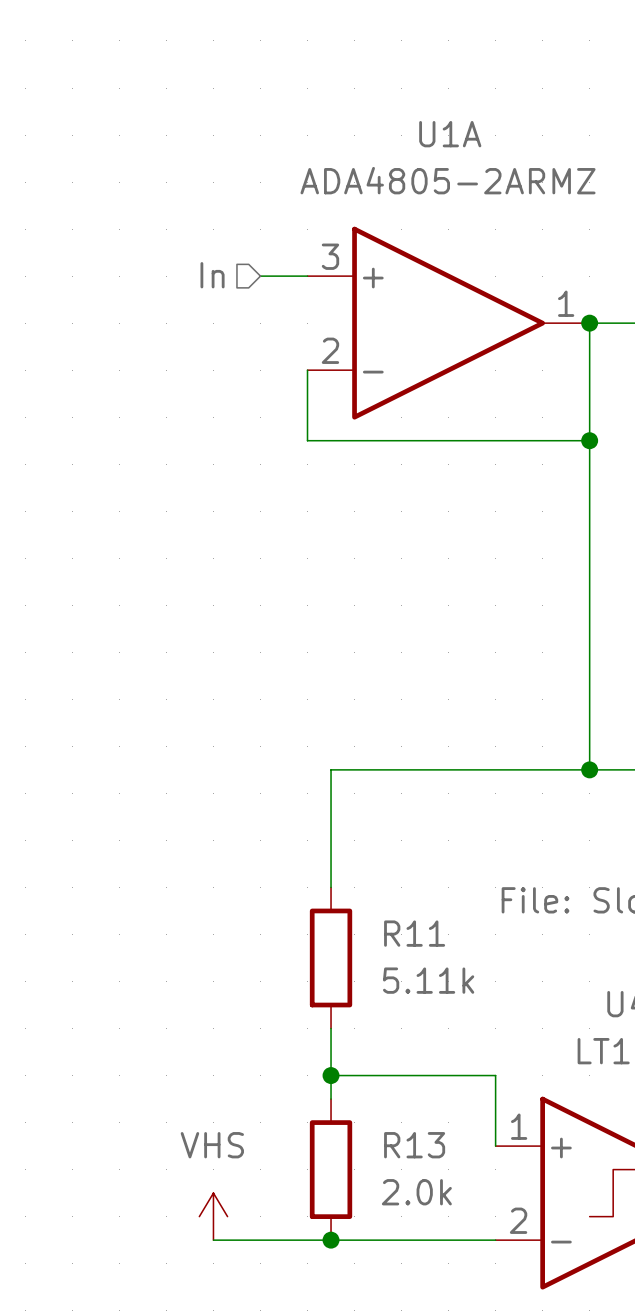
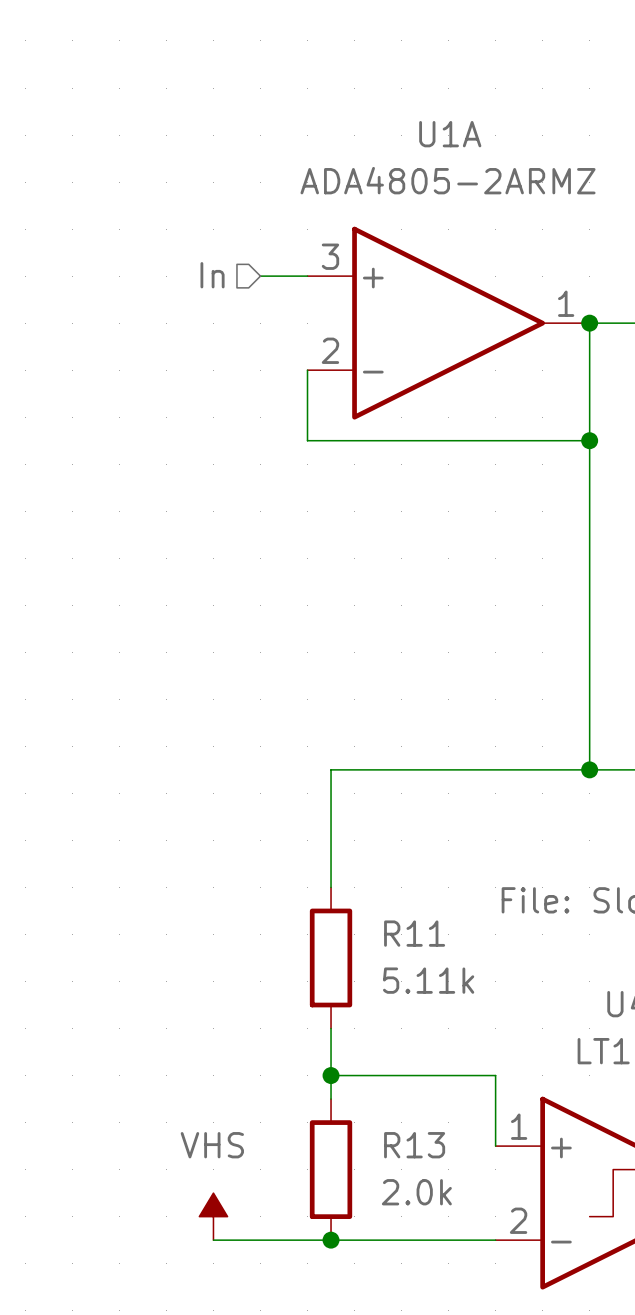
power symbol shape: [199, 1193, 228, 1241] -> [199, 1193, 228, 1241]

